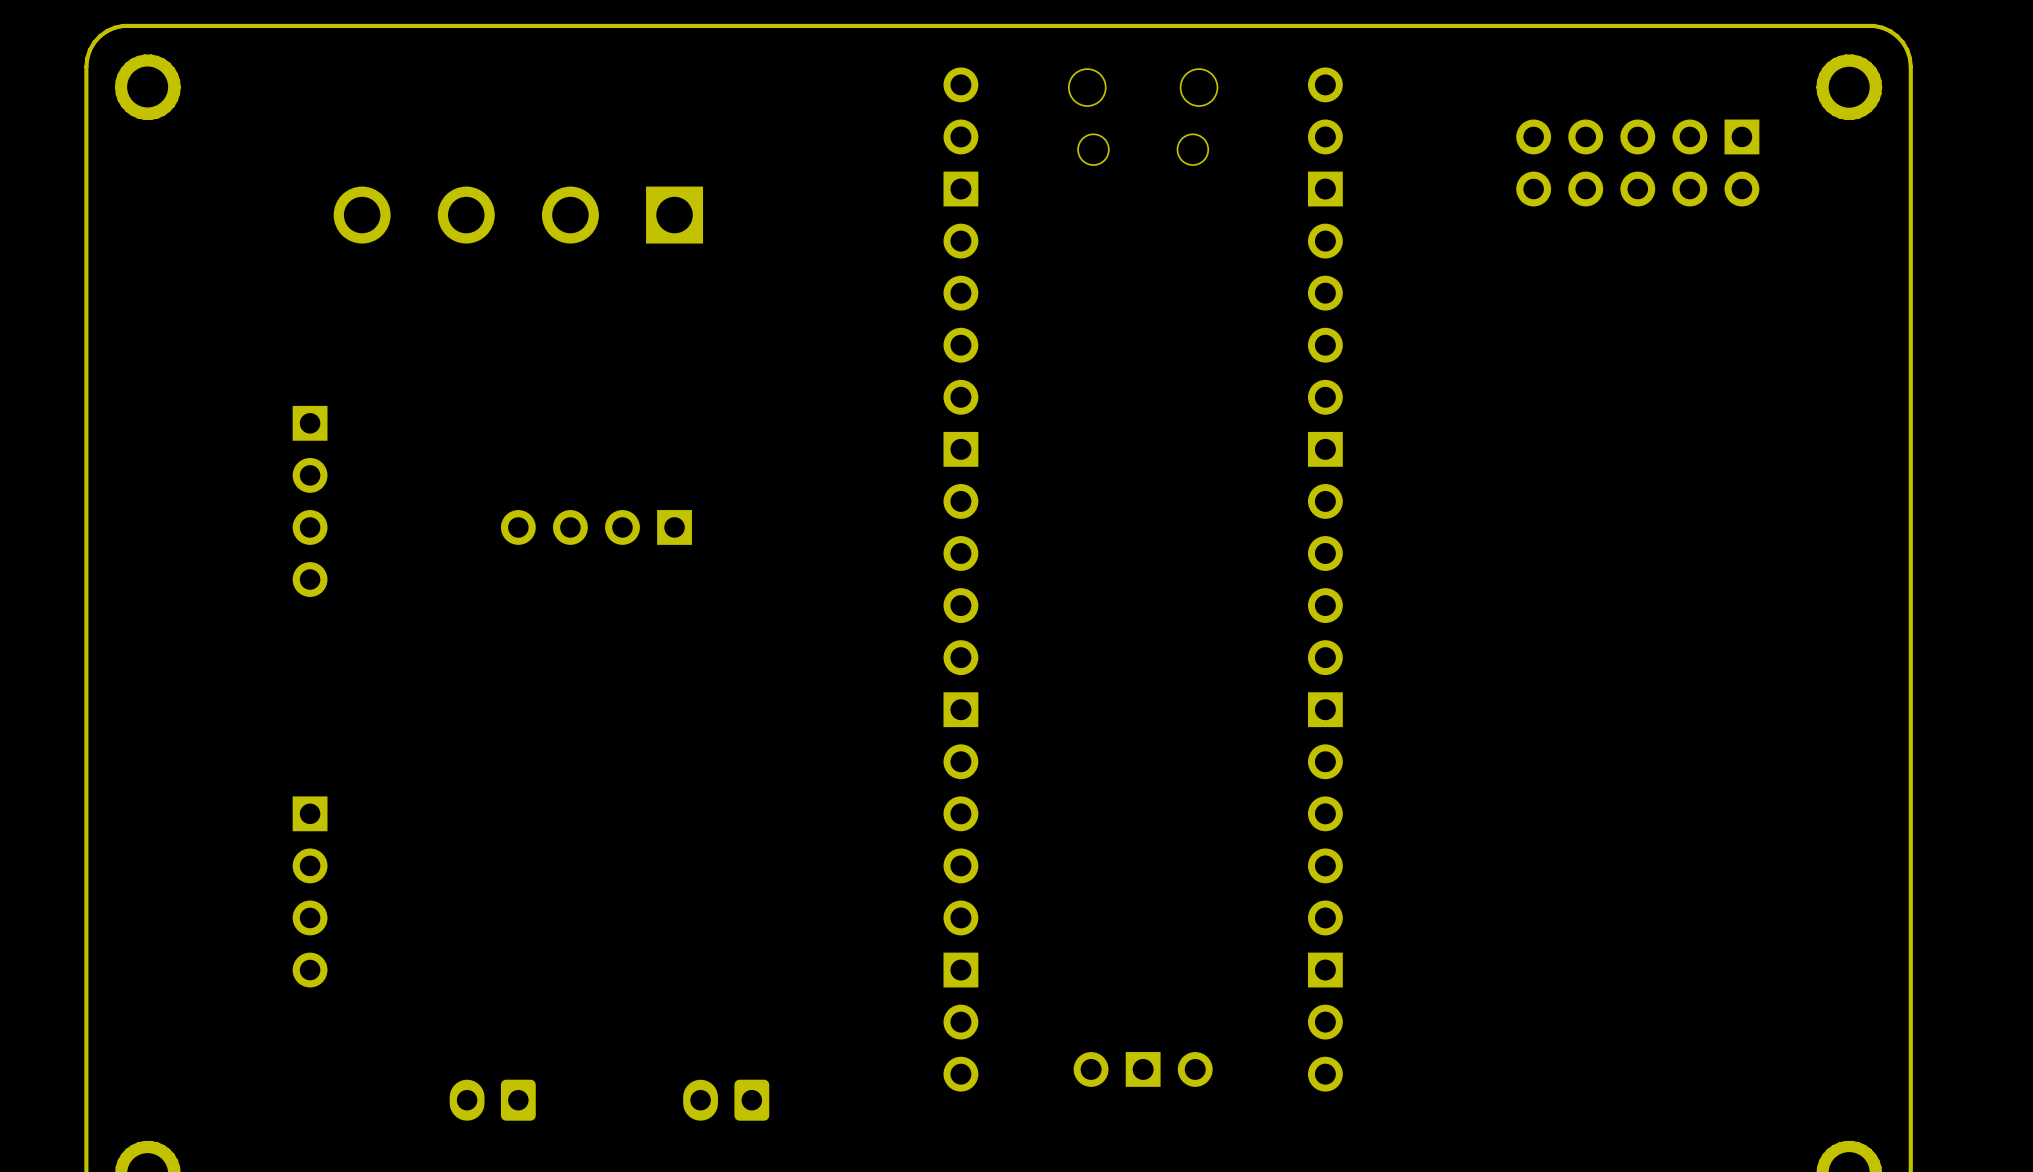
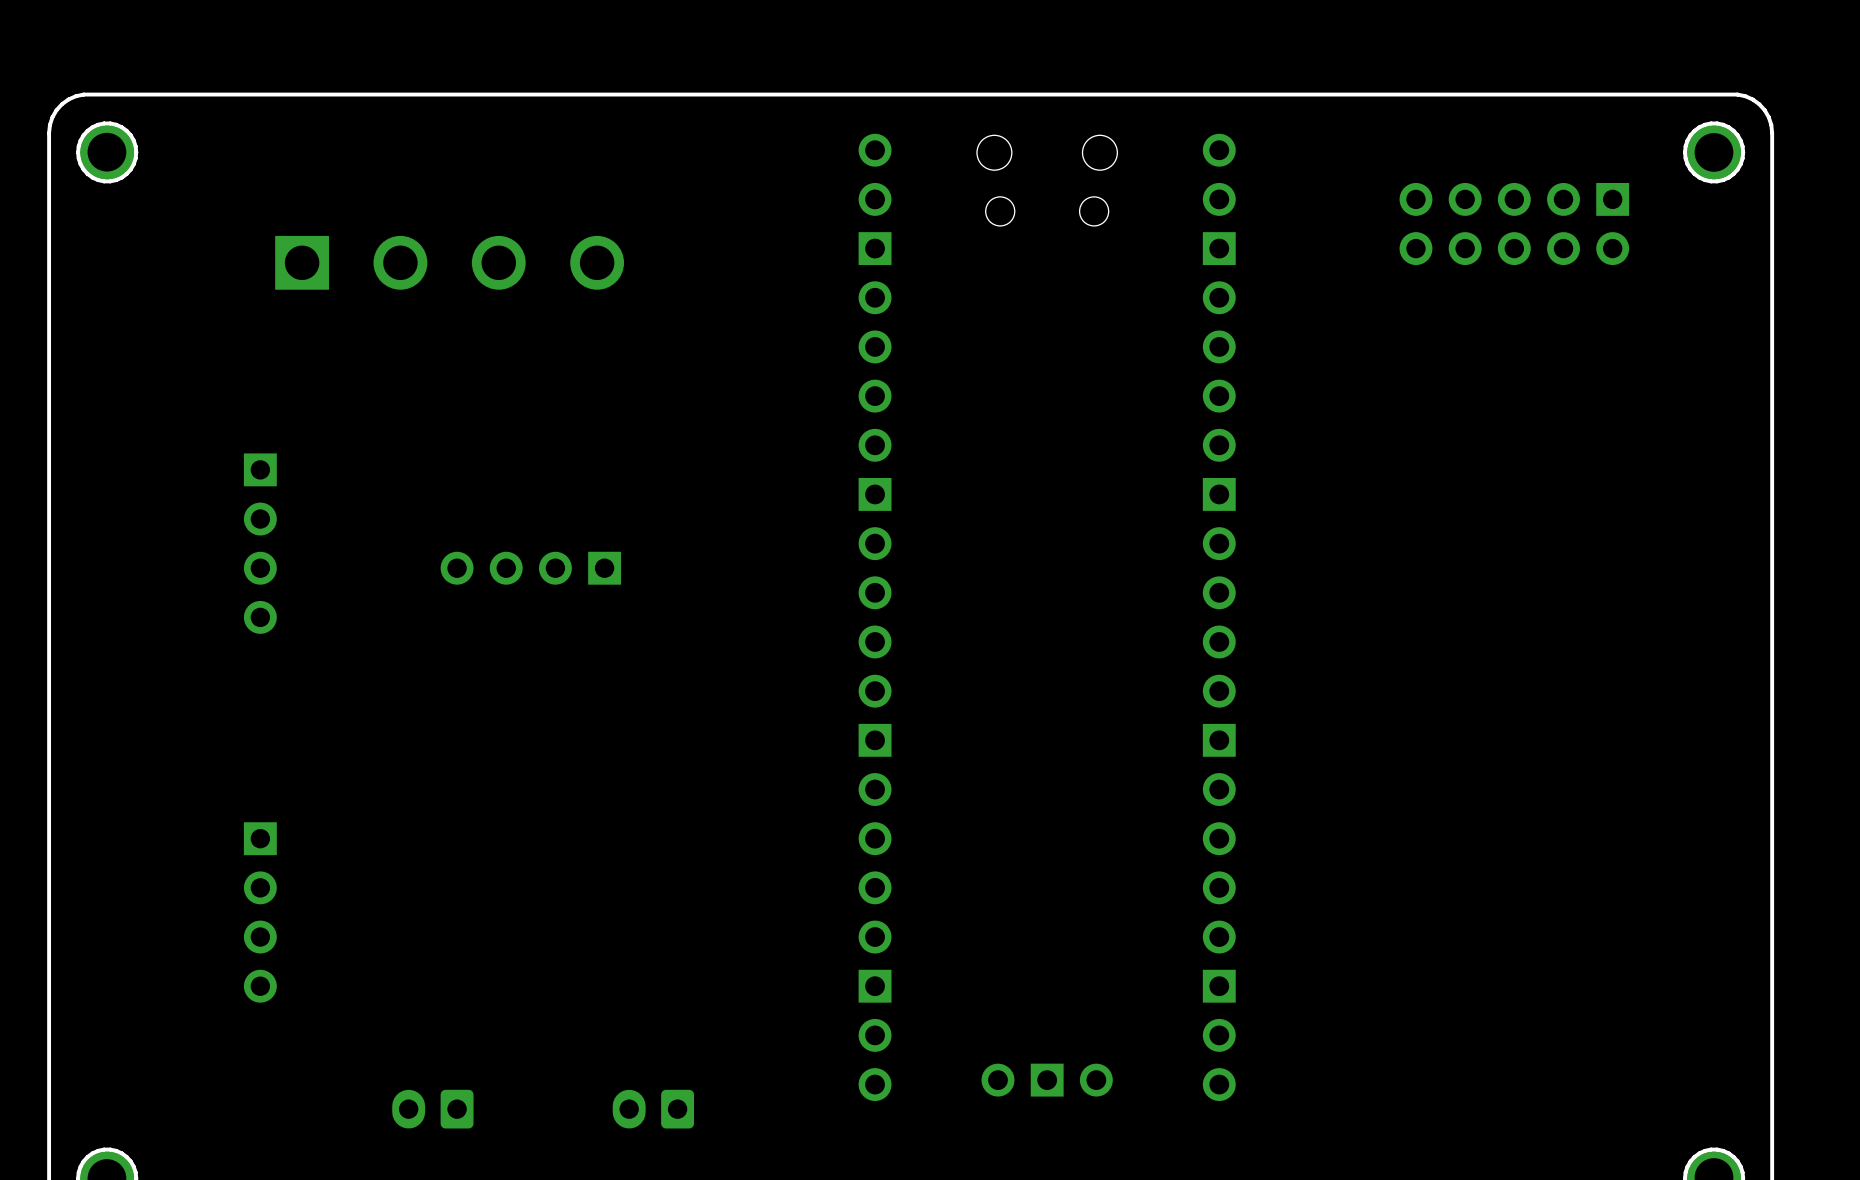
part rotation: 0° (518, 215) -> 180° (449, 262)

